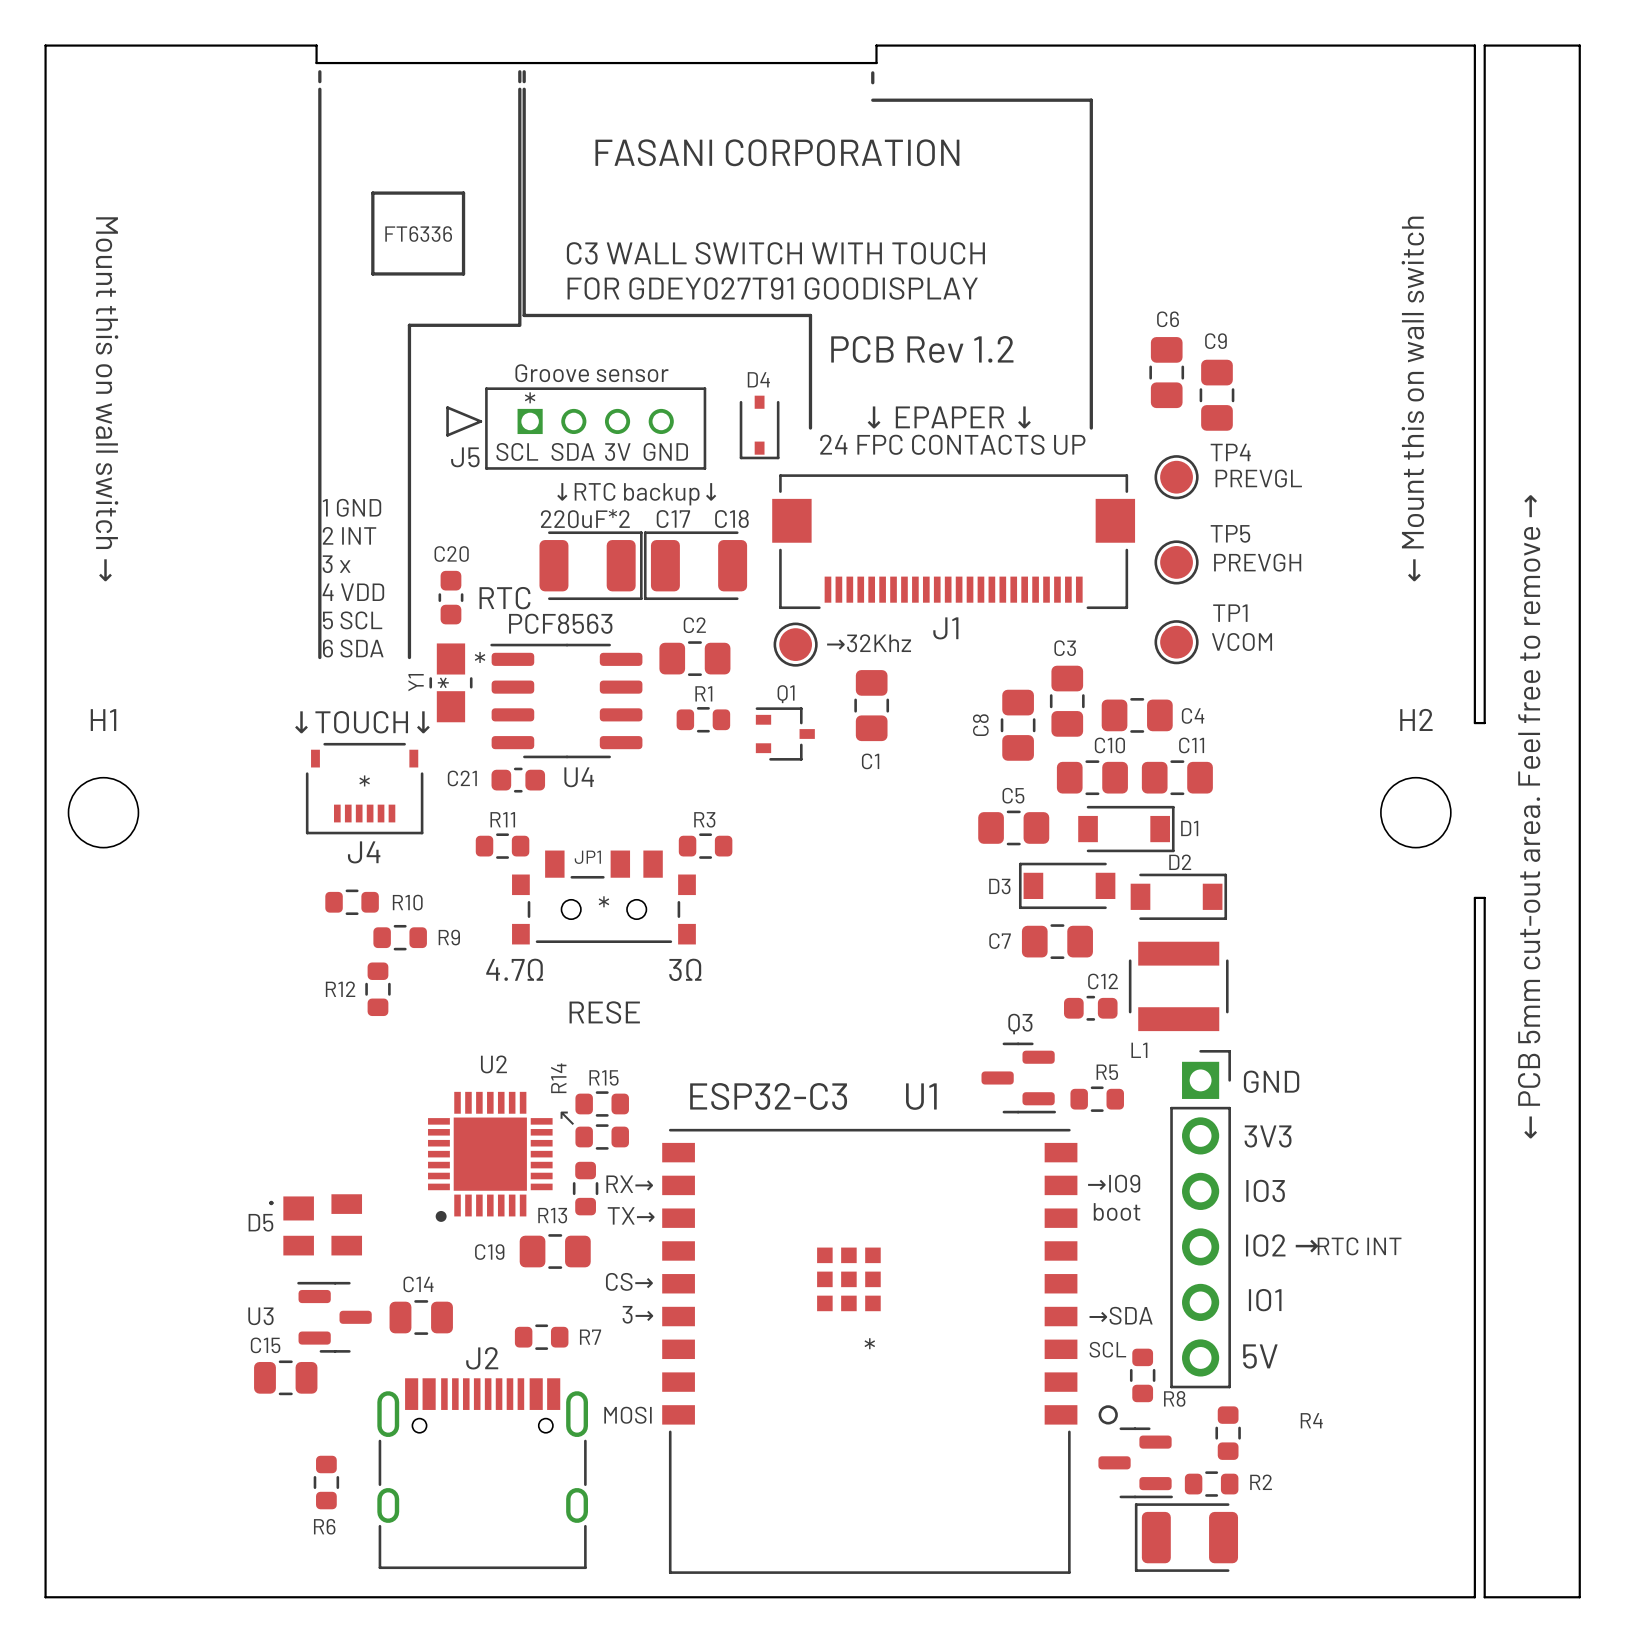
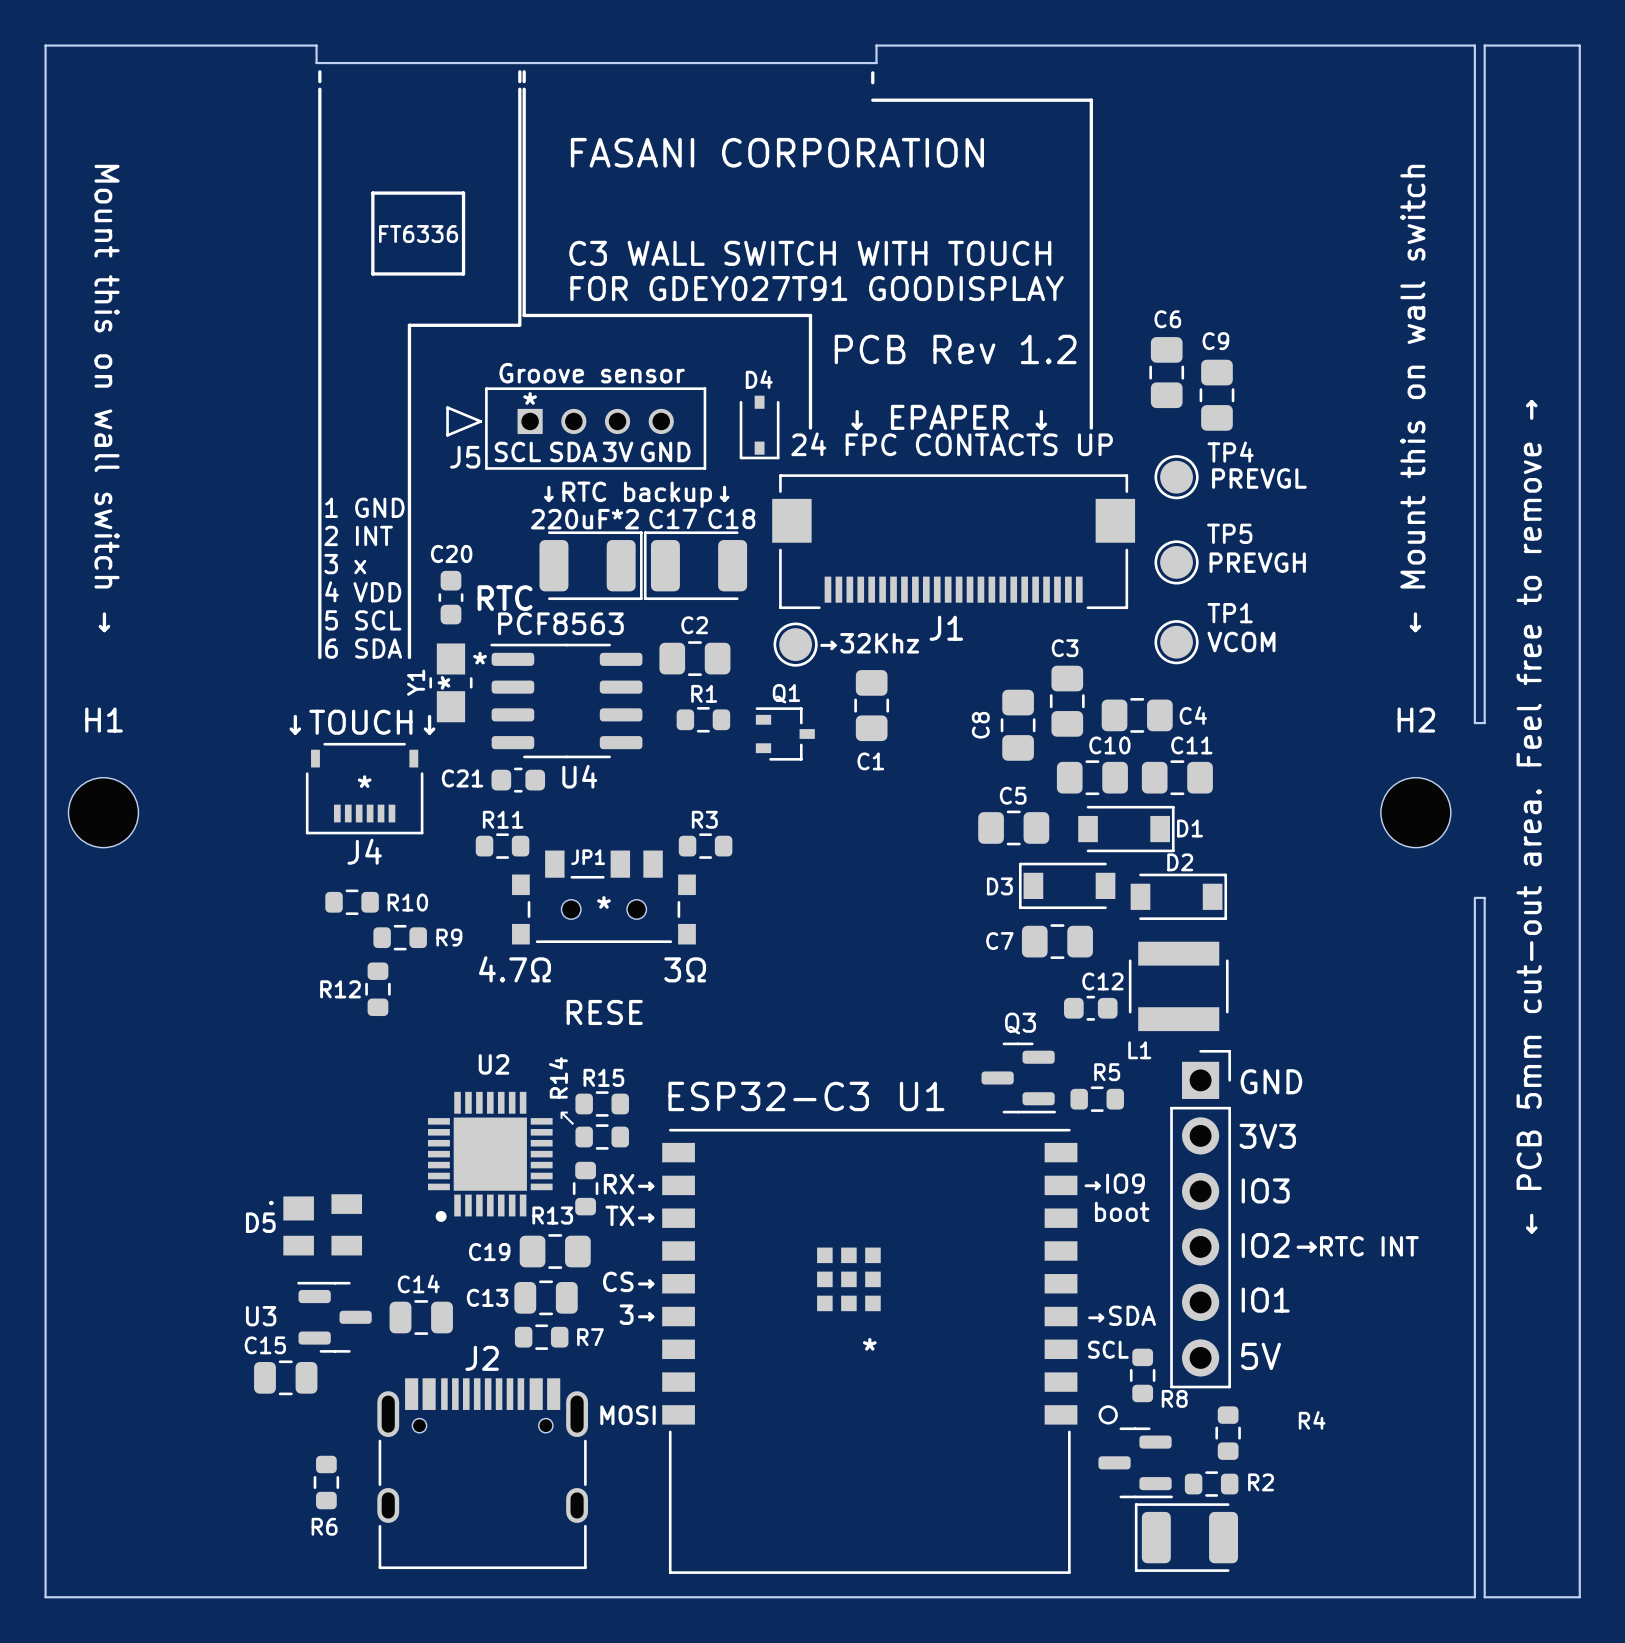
C13: none -> (546, 1297)

